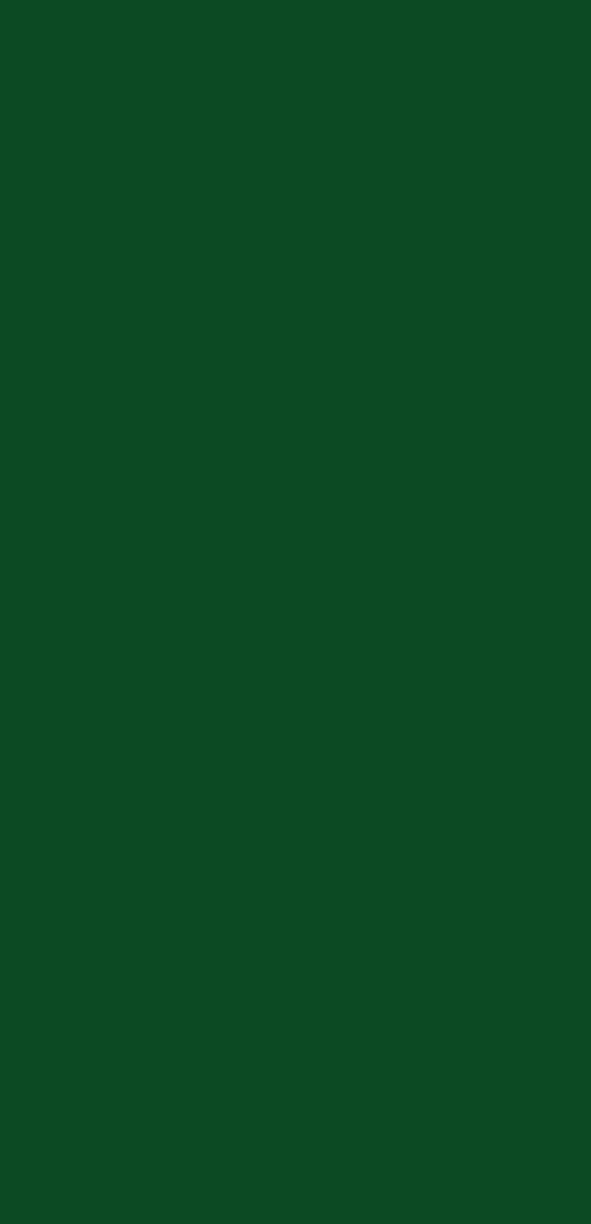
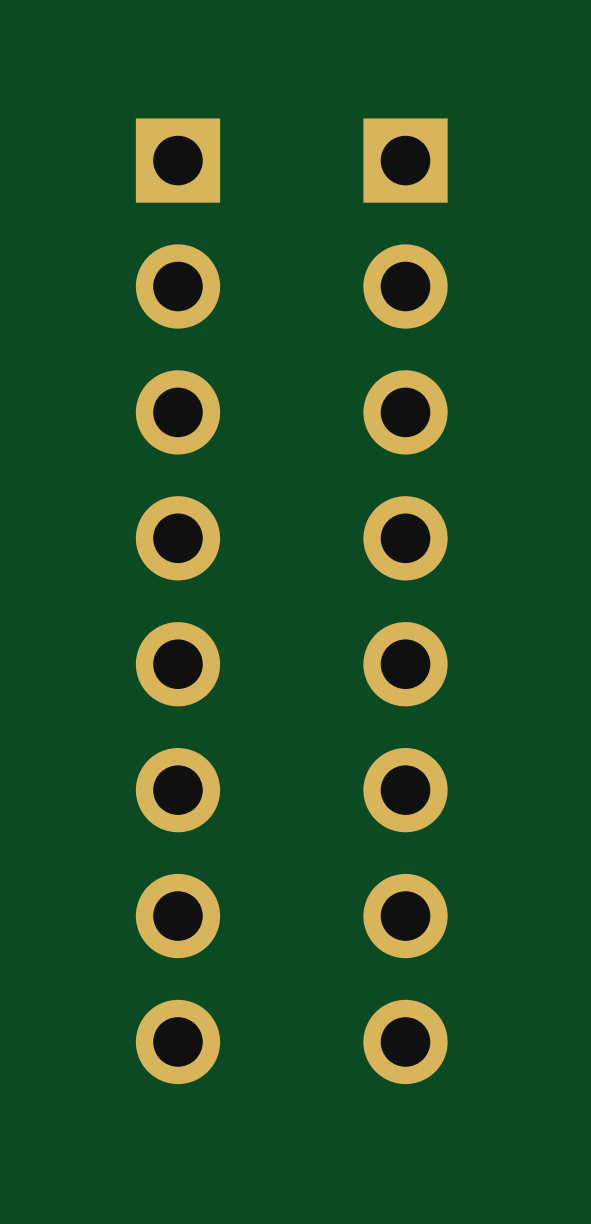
part: none -> (177, 601)
part: none -> (405, 601)

